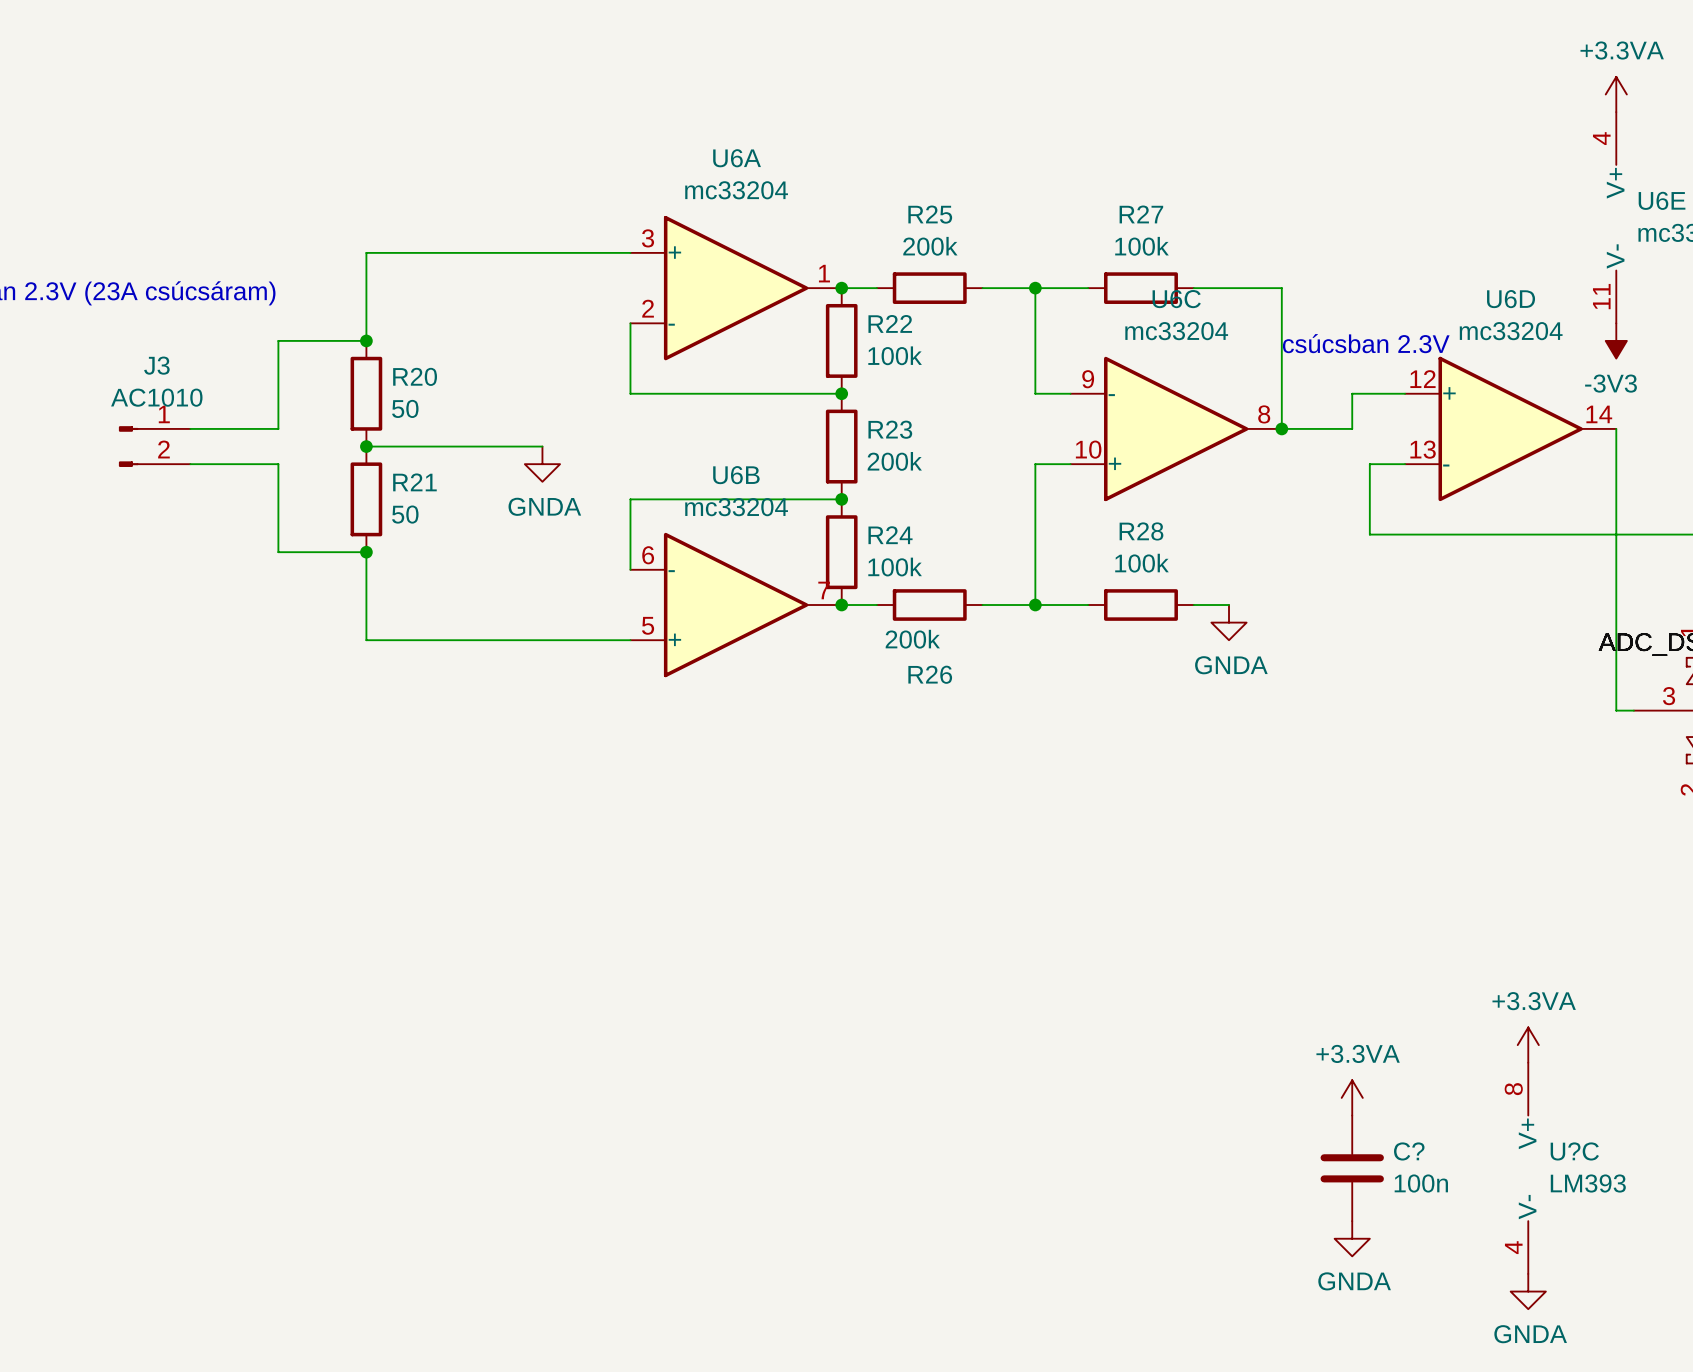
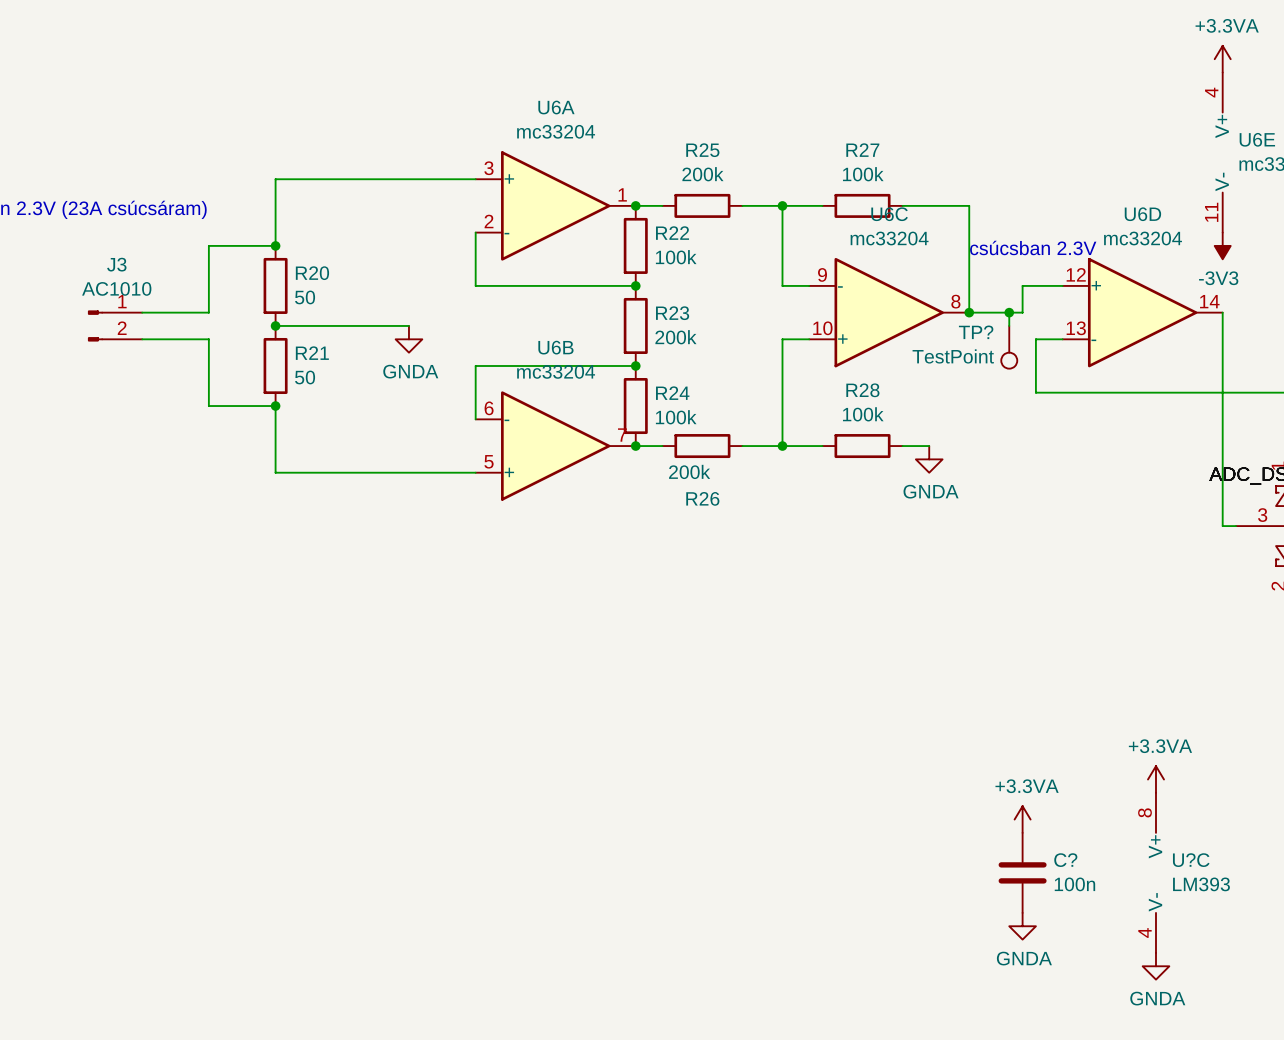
wire: none -> (1009, 312) (1009, 325)
junction: none -> (1009, 312)
TP?: none -> TestPoint (1009, 347)

